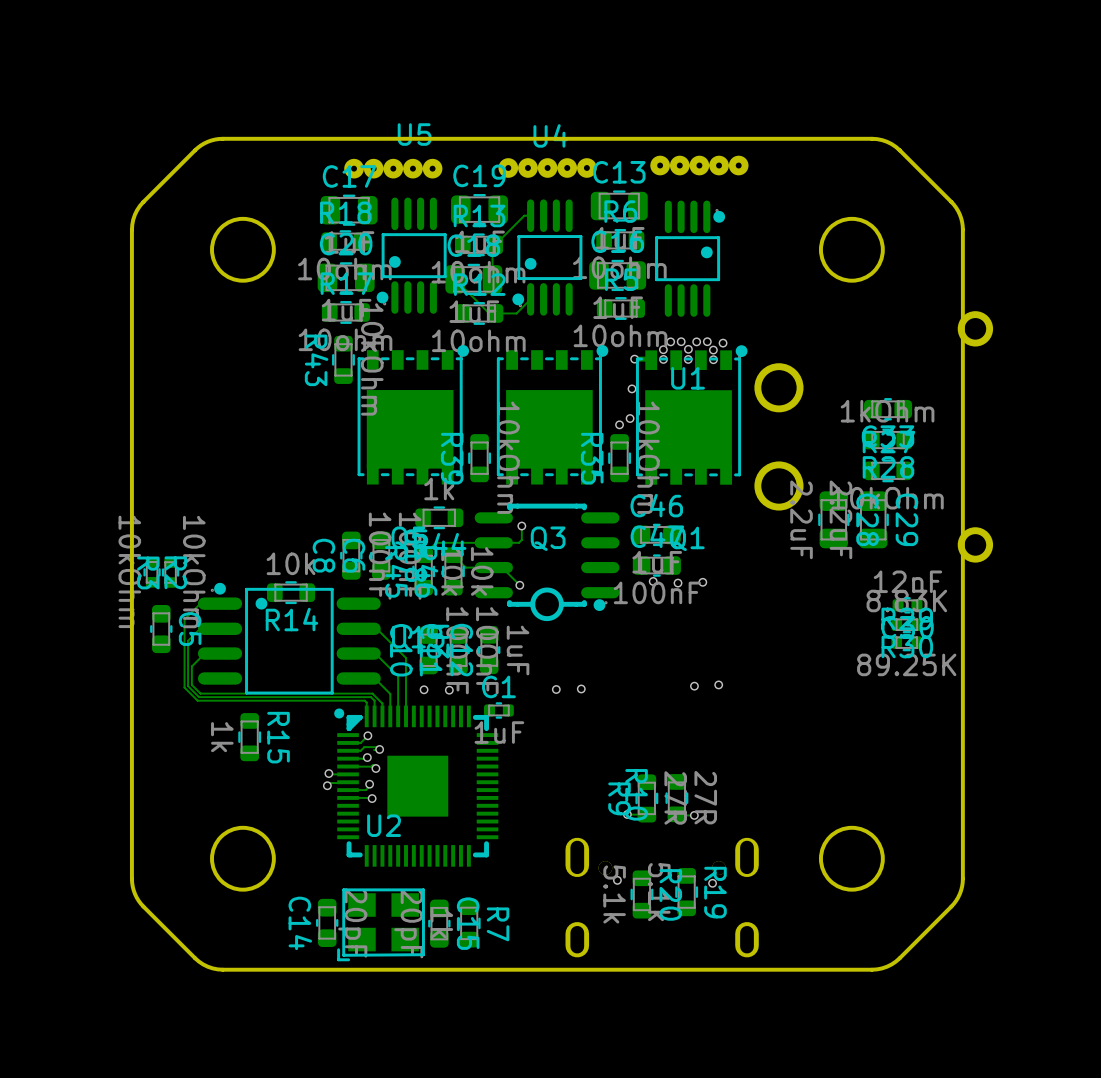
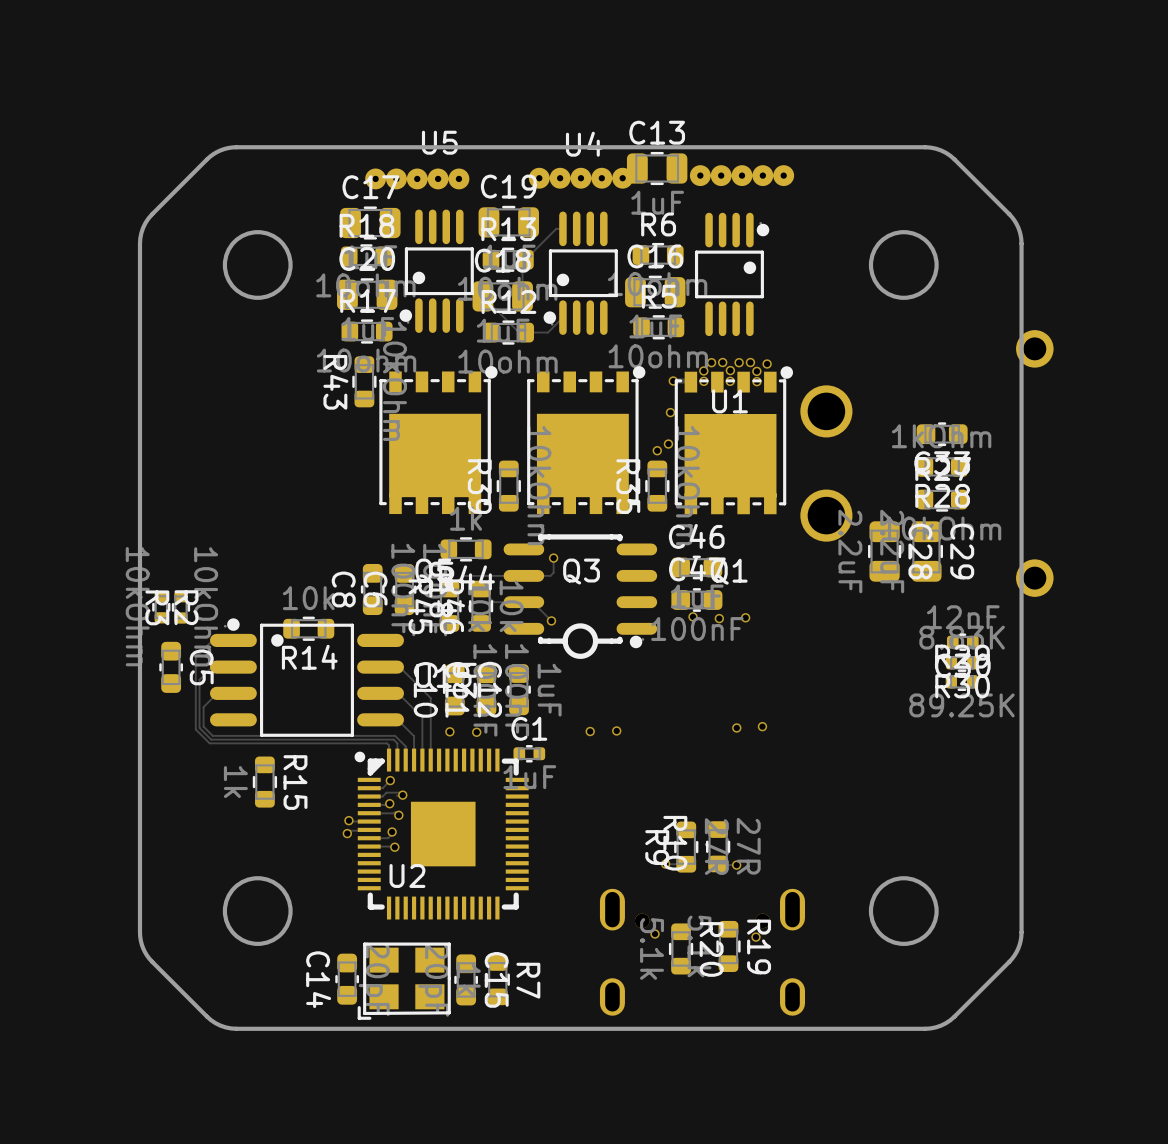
C13 position: (619, 206) -> (657, 168)

